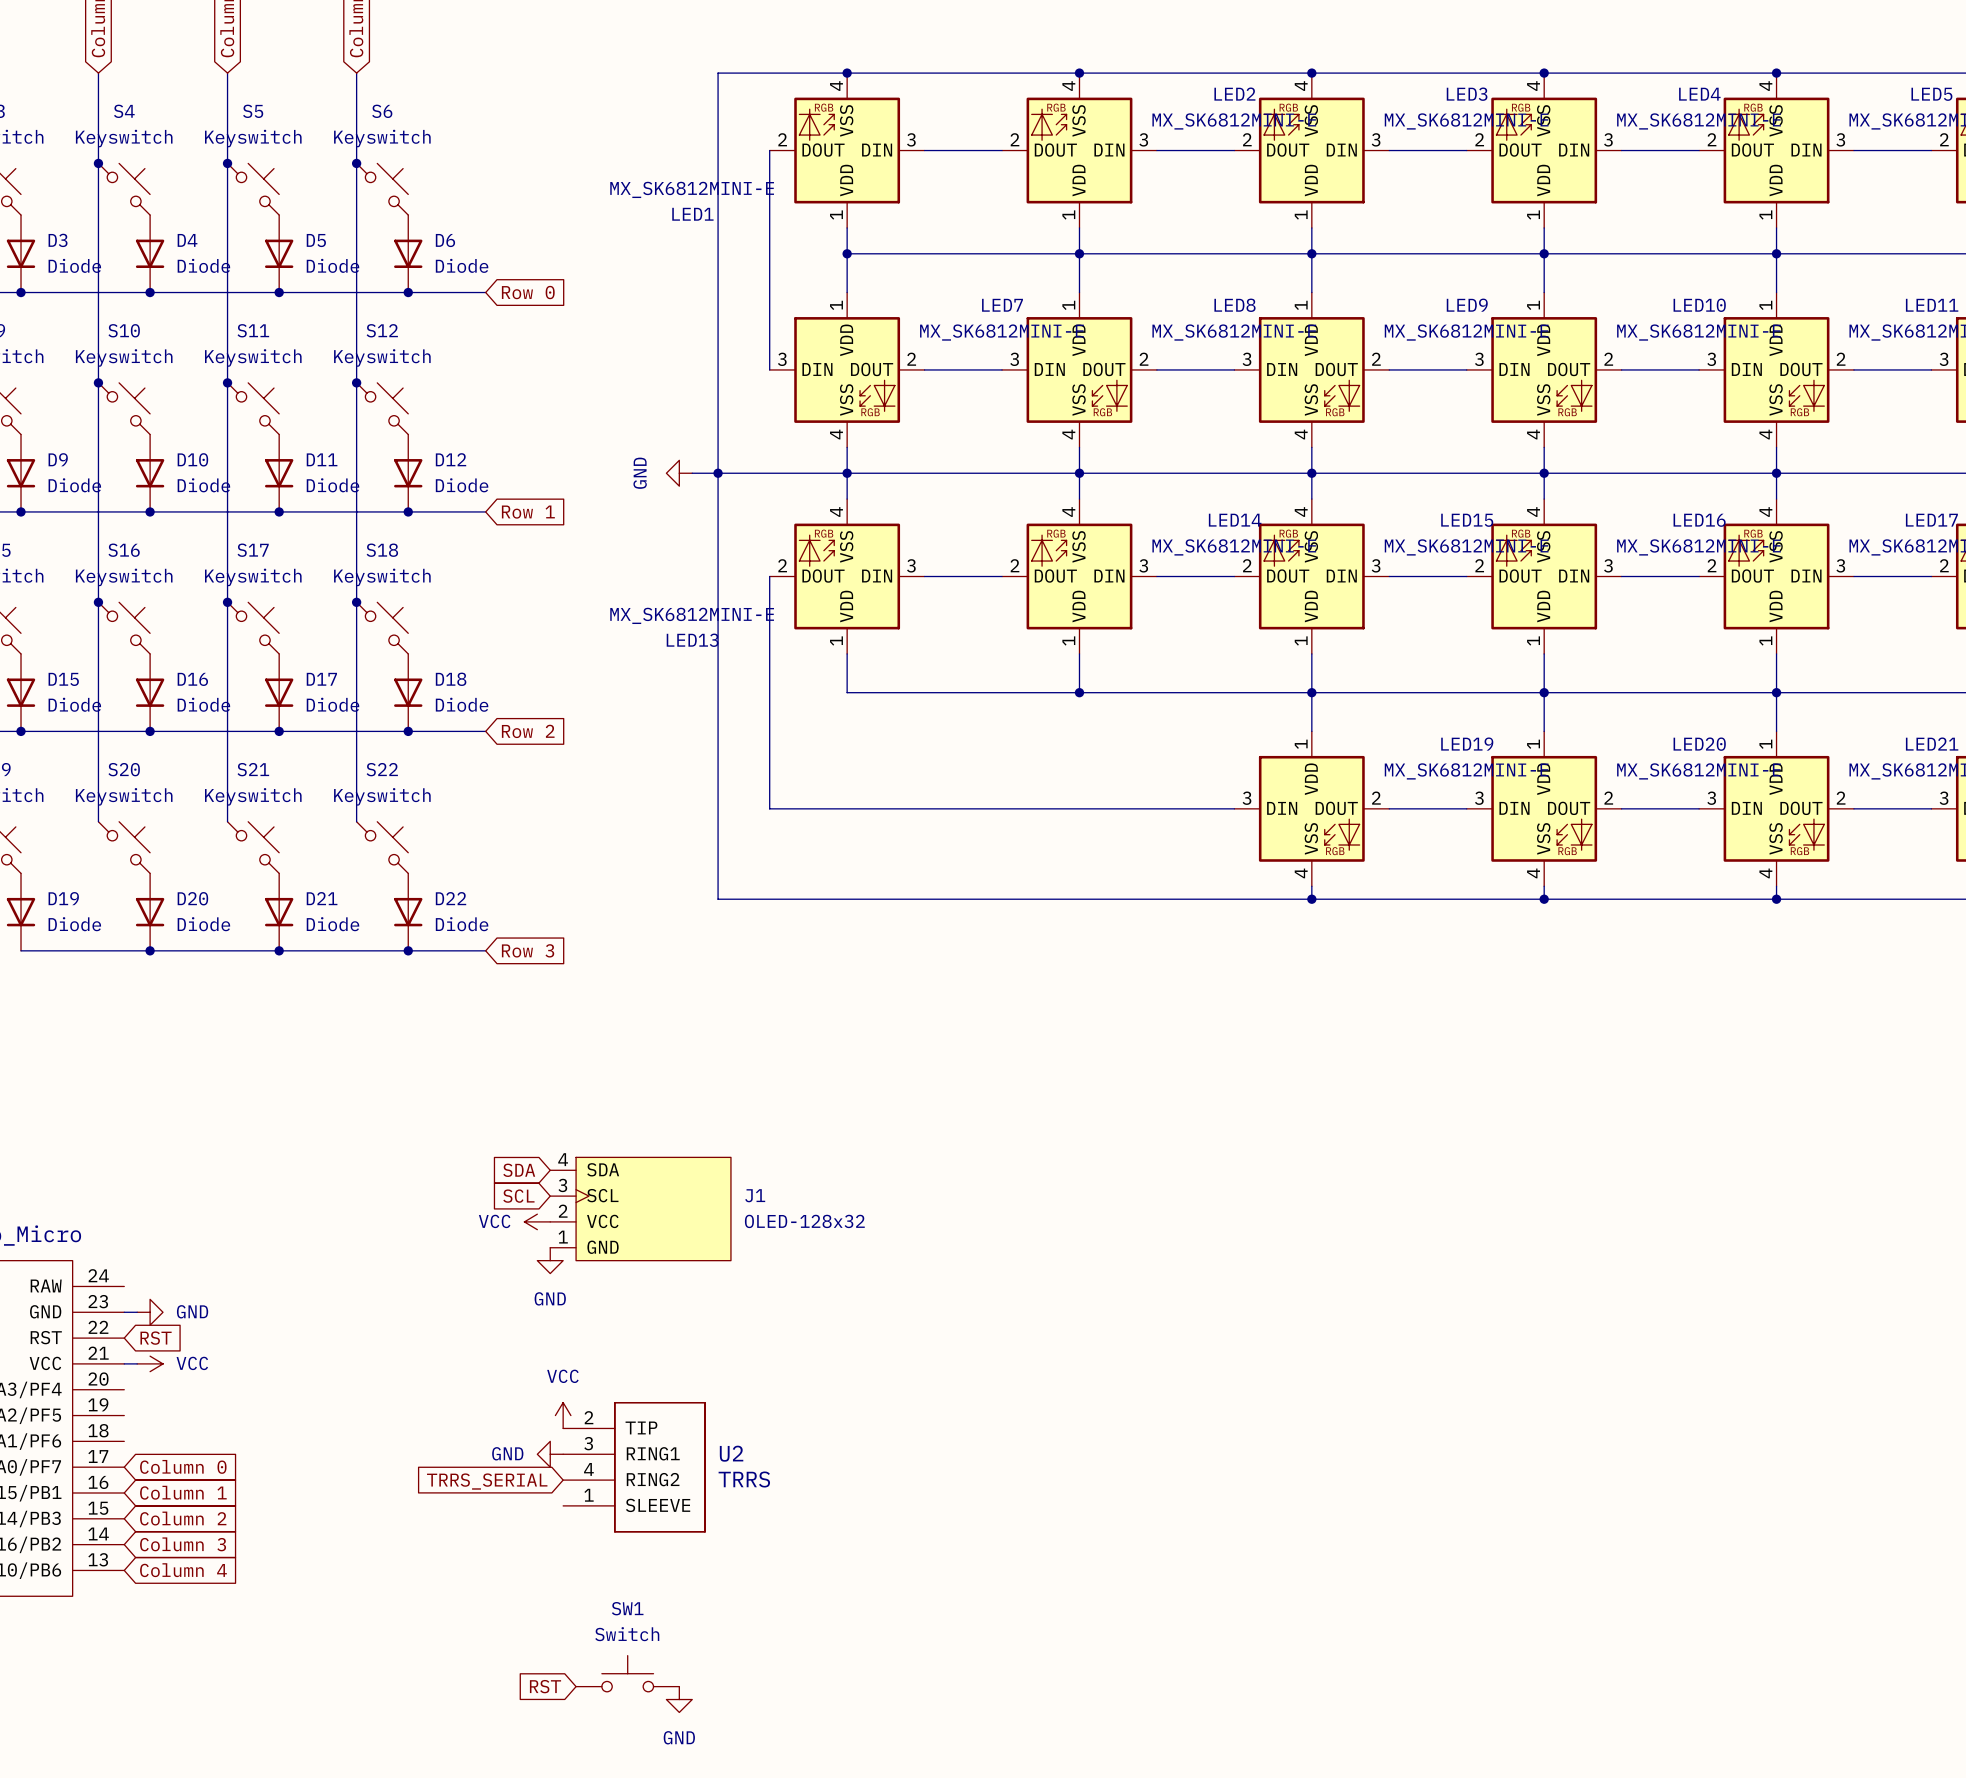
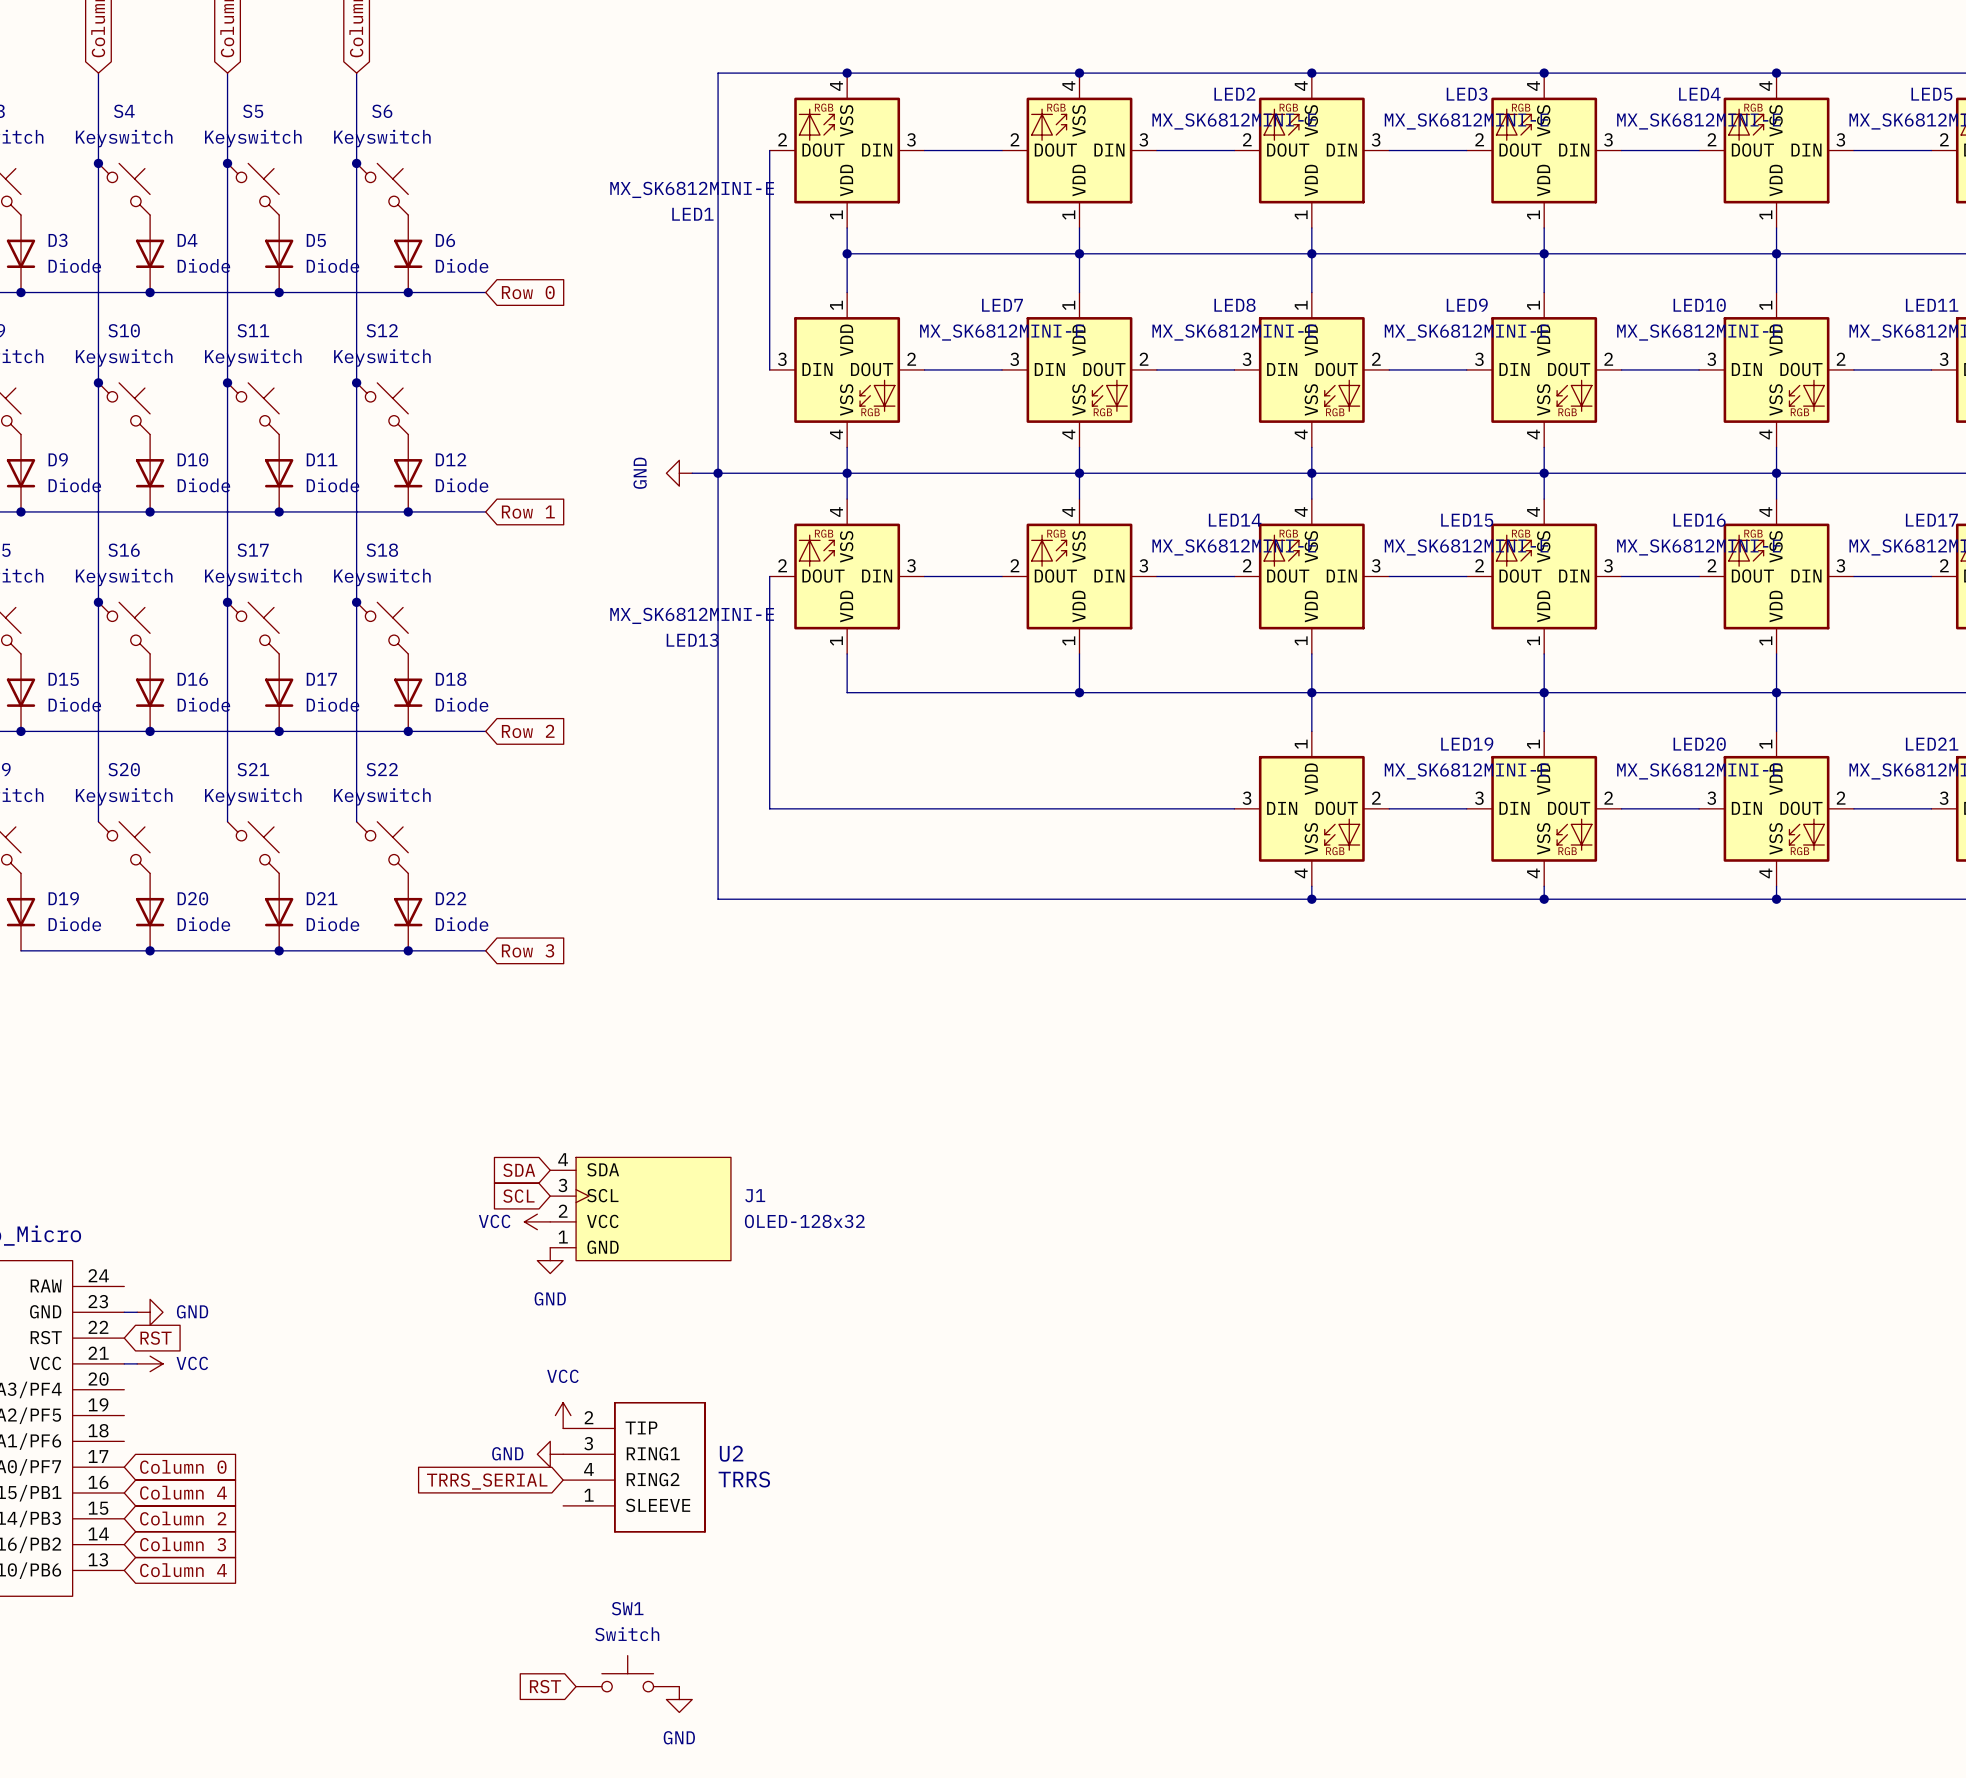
global label: Column 1 (183, 1492) -> Column 4 (183, 1492)

